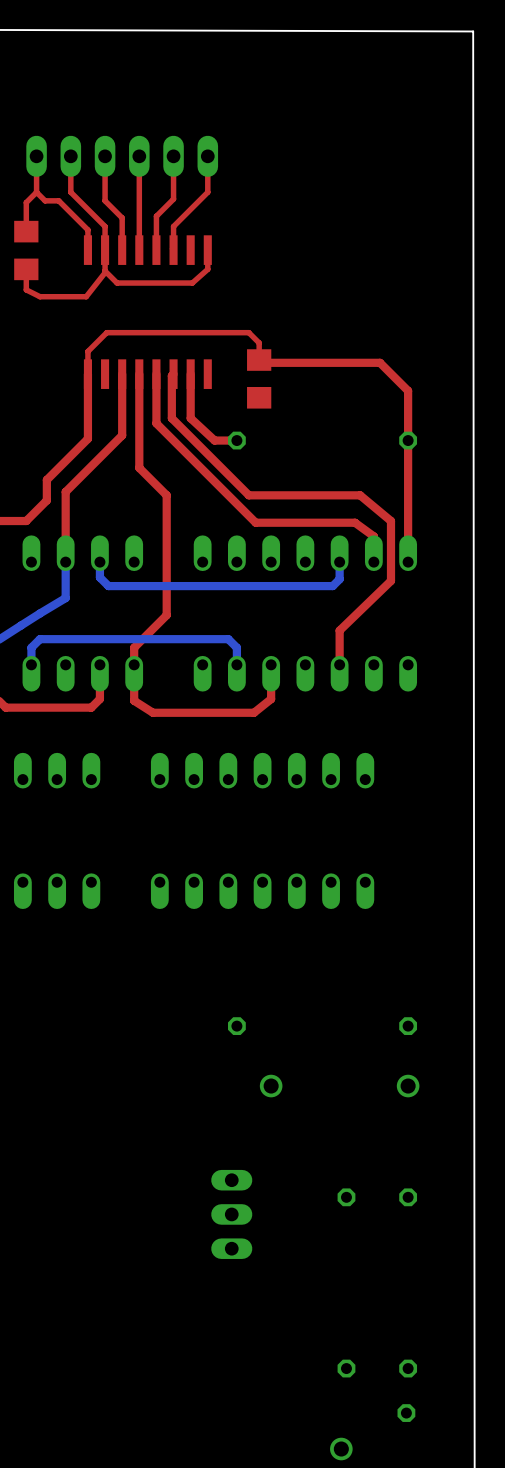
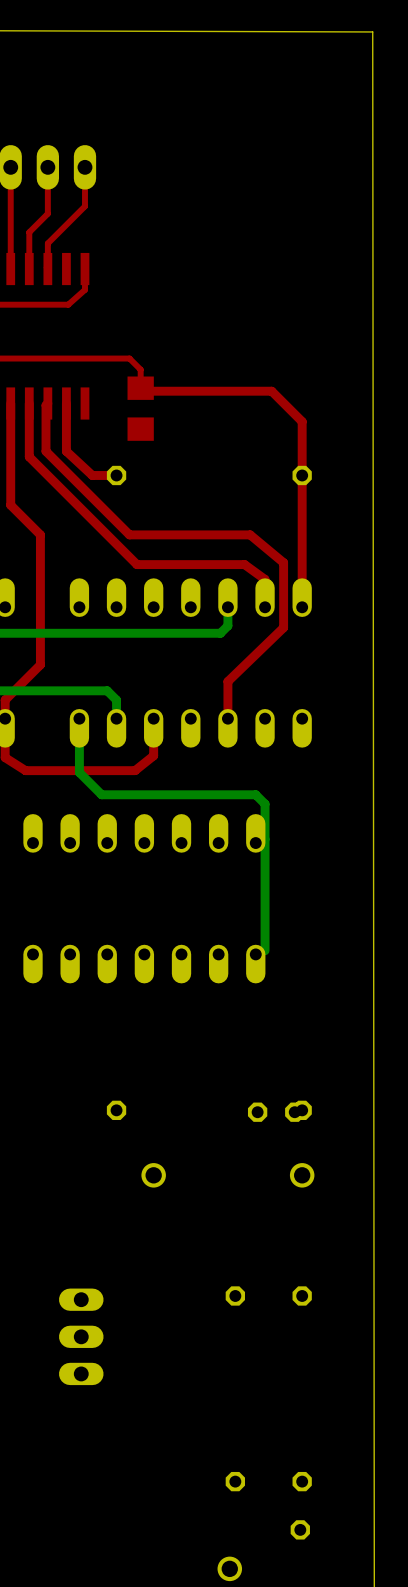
bottom track: none -> (79, 718) (79, 772) (101, 794) (255, 794) (265, 804) (265, 950)
part: none -> (276, 1112)
part position: (231, 1214) -> (81, 1336)

